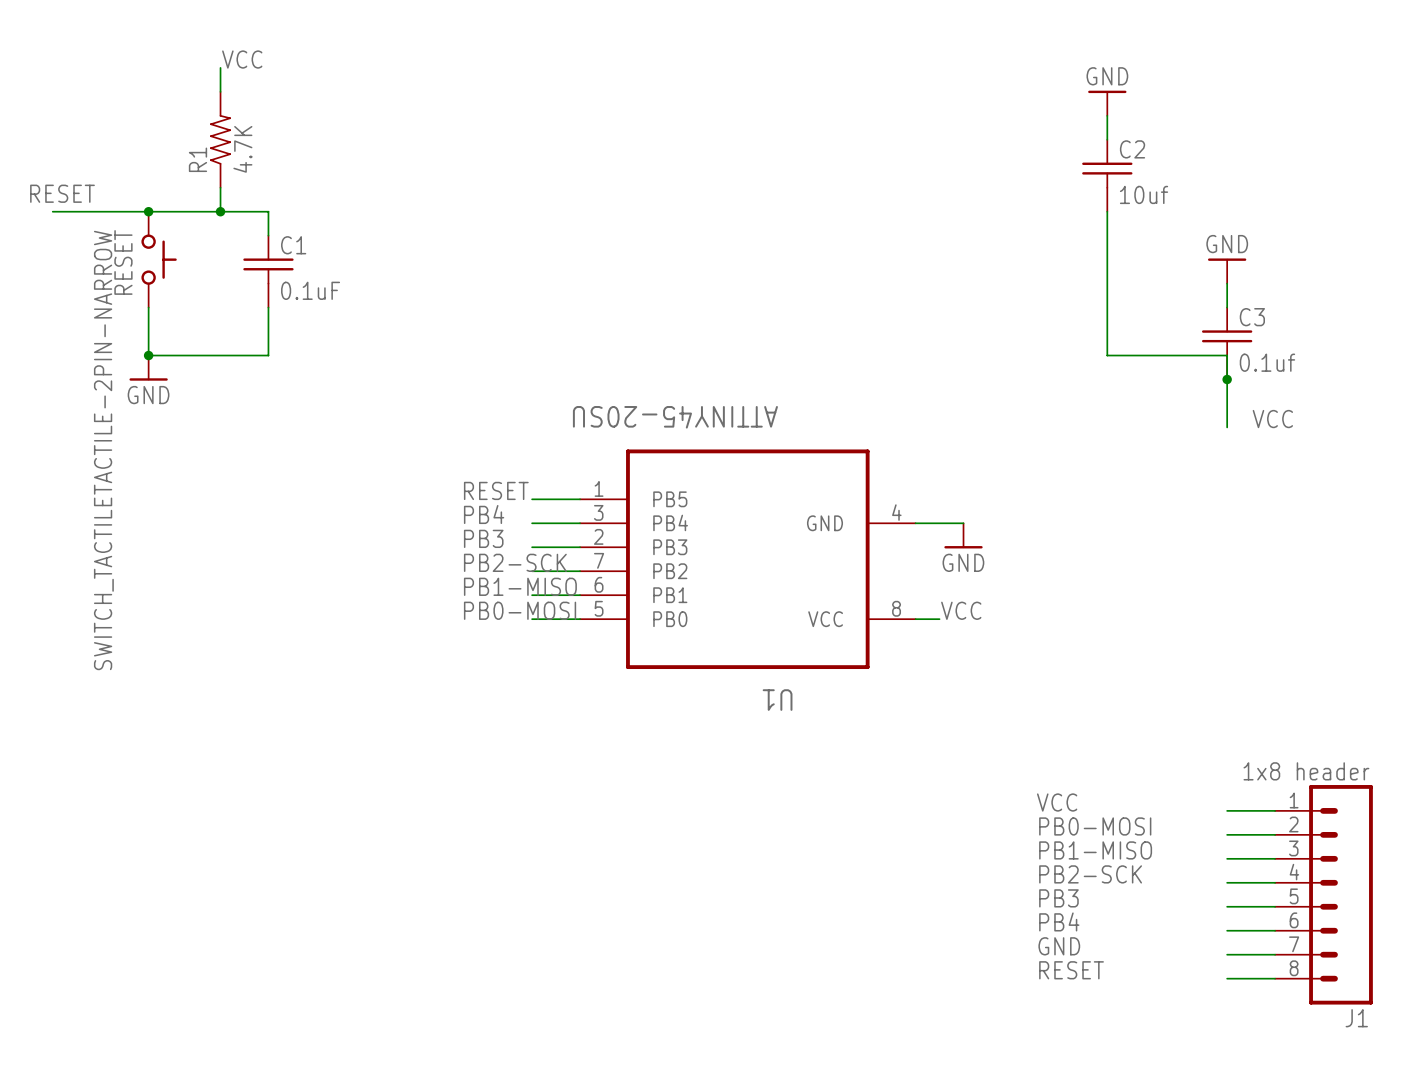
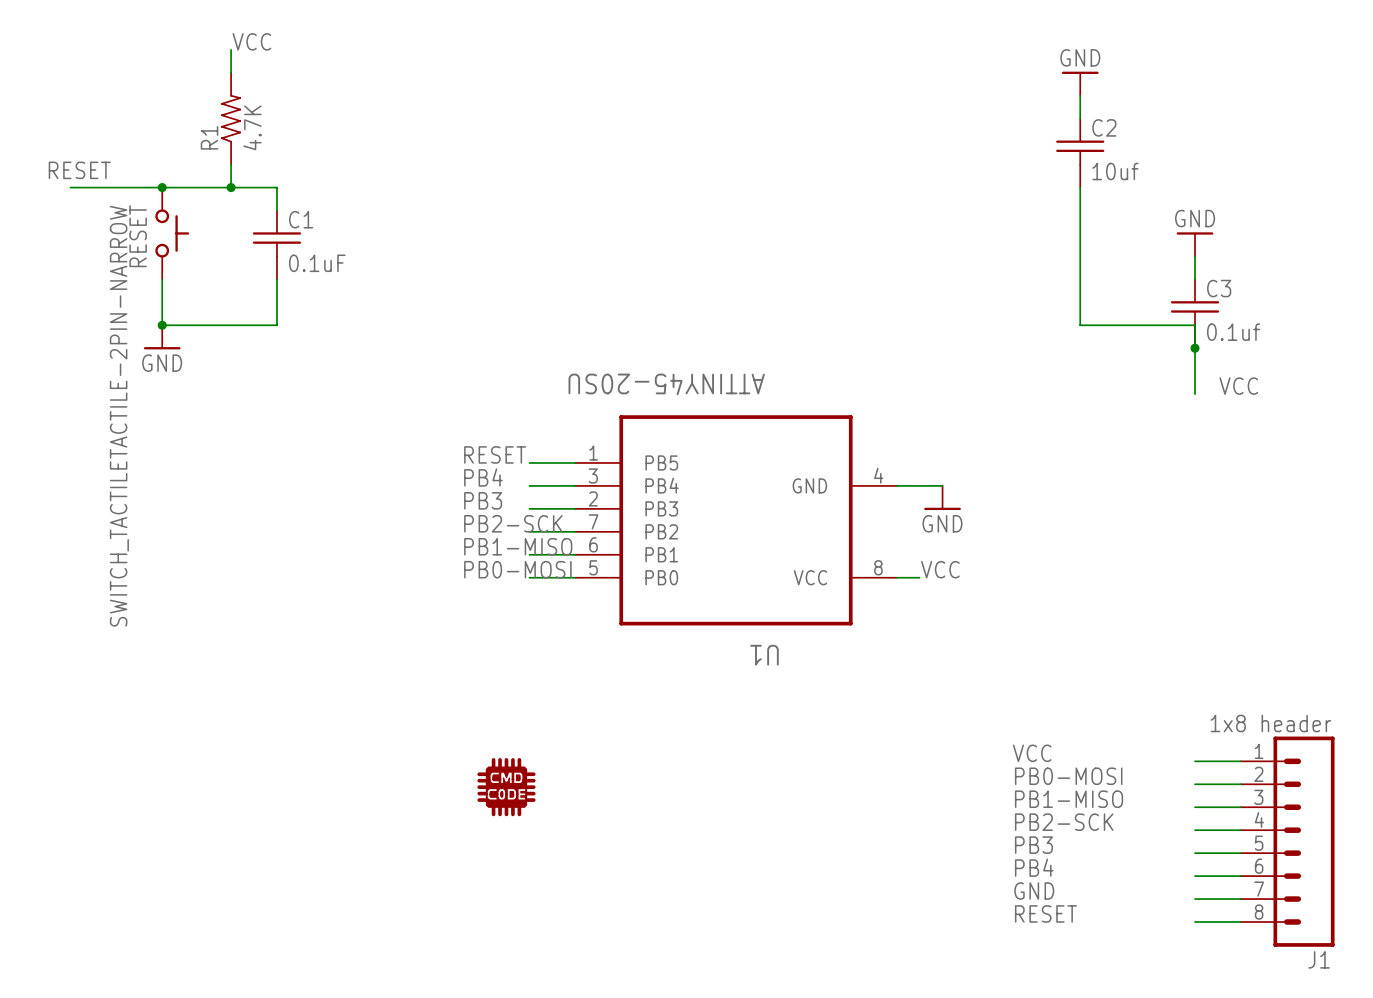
part: none -> (506, 787)

